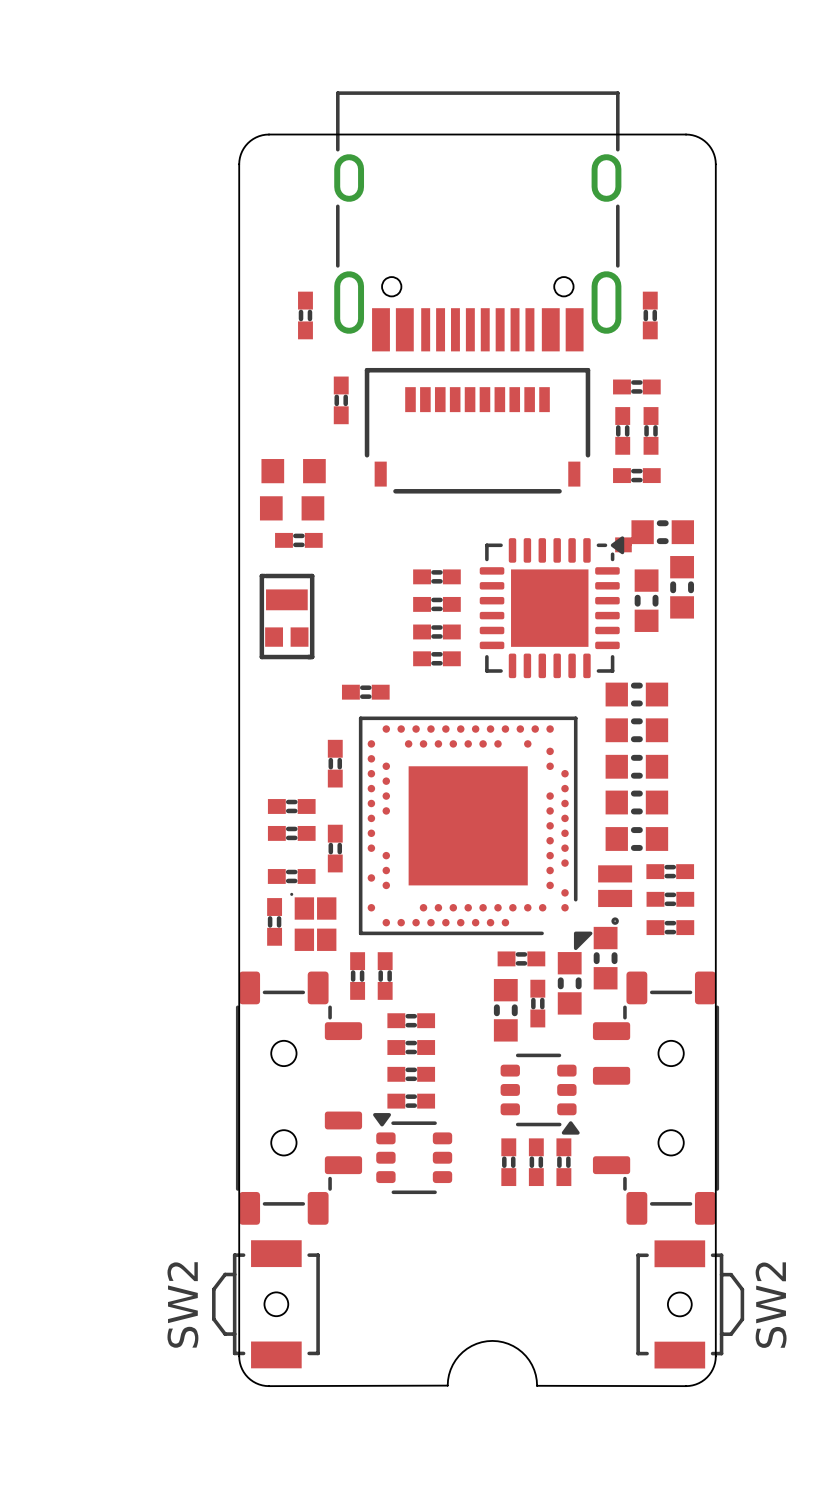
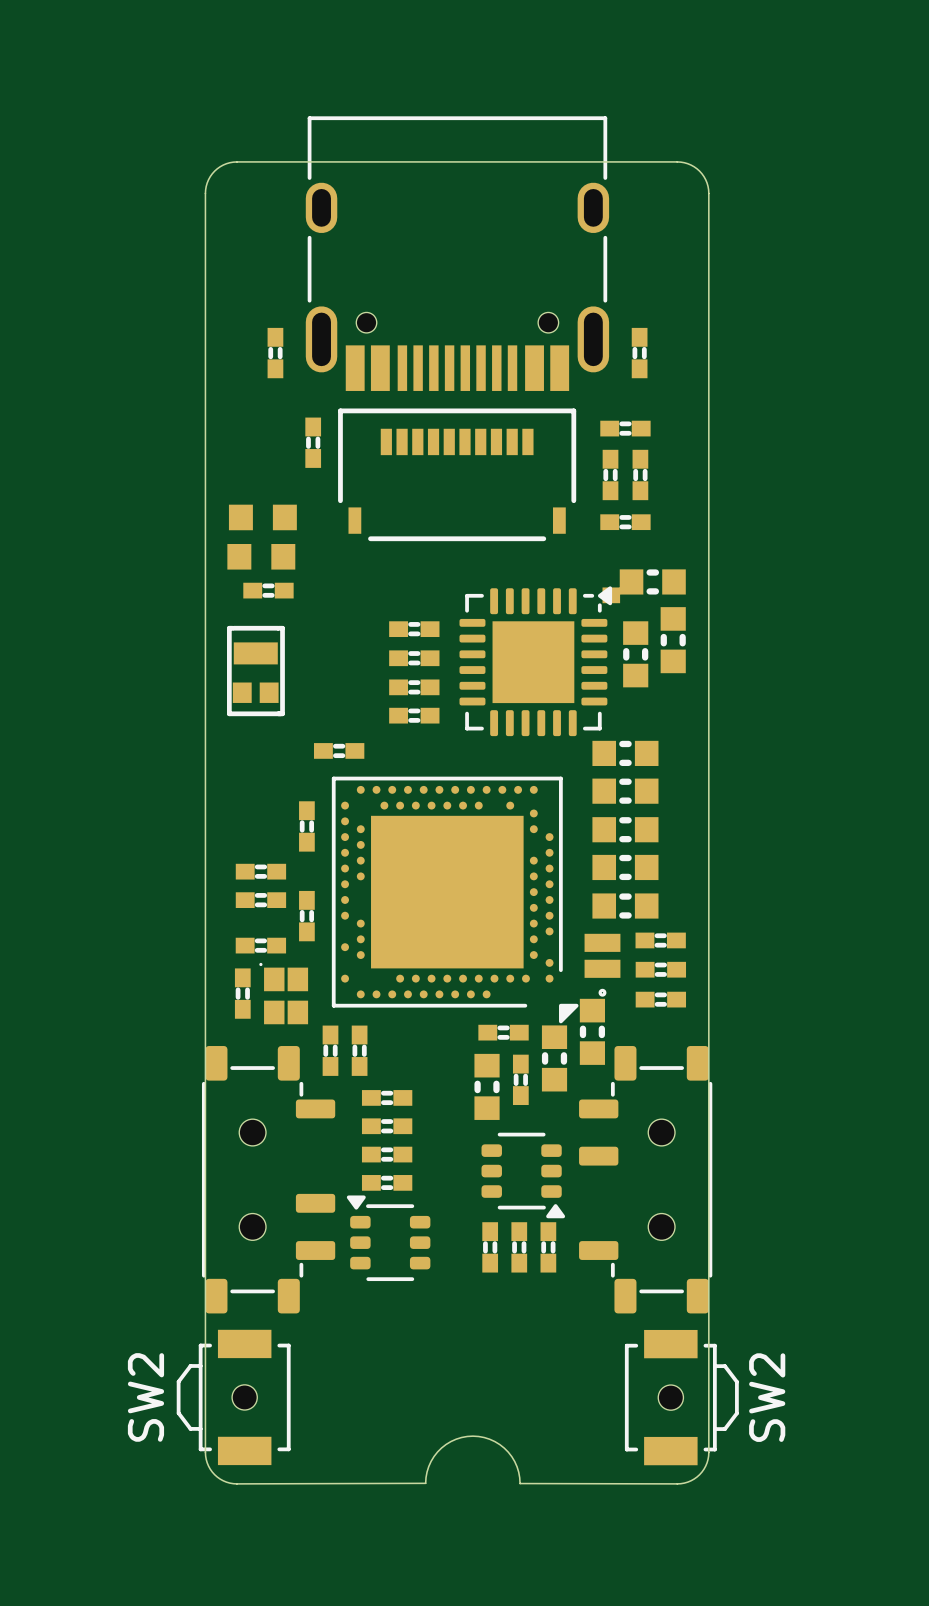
part footprint: [358, 716, 593, 951] -> [331, 776, 579, 1024]

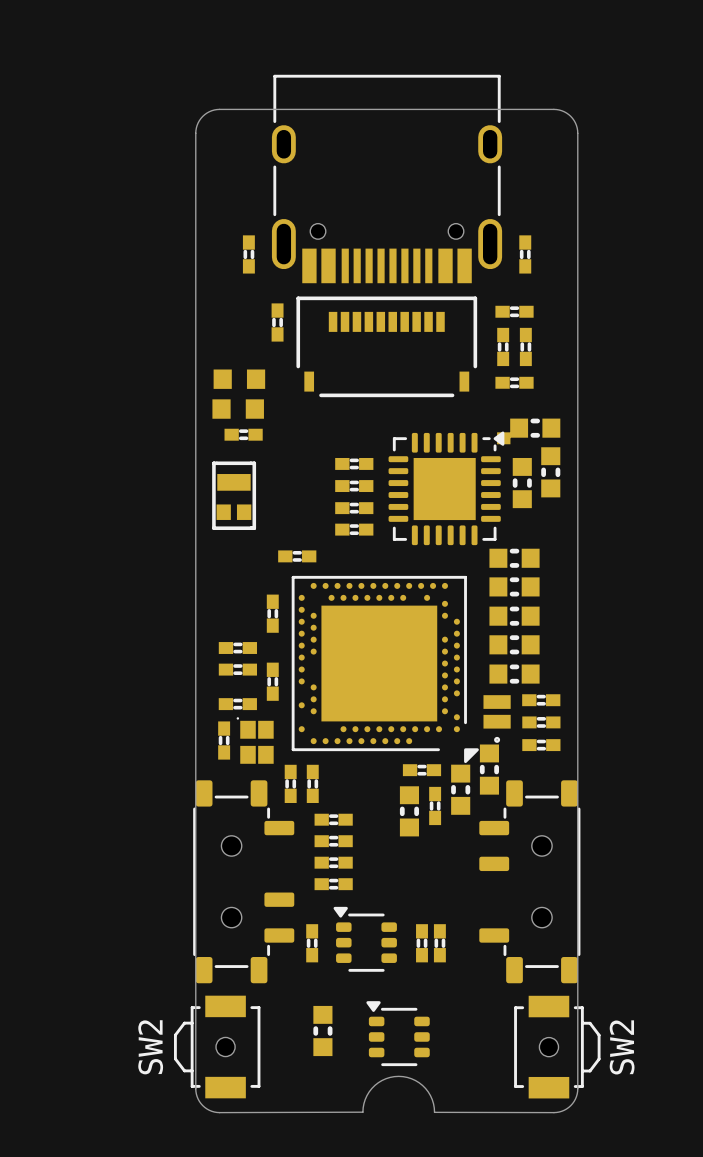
part: (523, 1175) -> none
part position: (388, 1238) -> (365, 939)
part: (490, 1247) -> none
part: (519, 1247) -> none
part: (548, 1247) -> none
part: none -> (312, 943)
part: none -> (422, 943)
part: none -> (439, 943)
part: none -> (322, 1031)
part: none -> (398, 1033)

